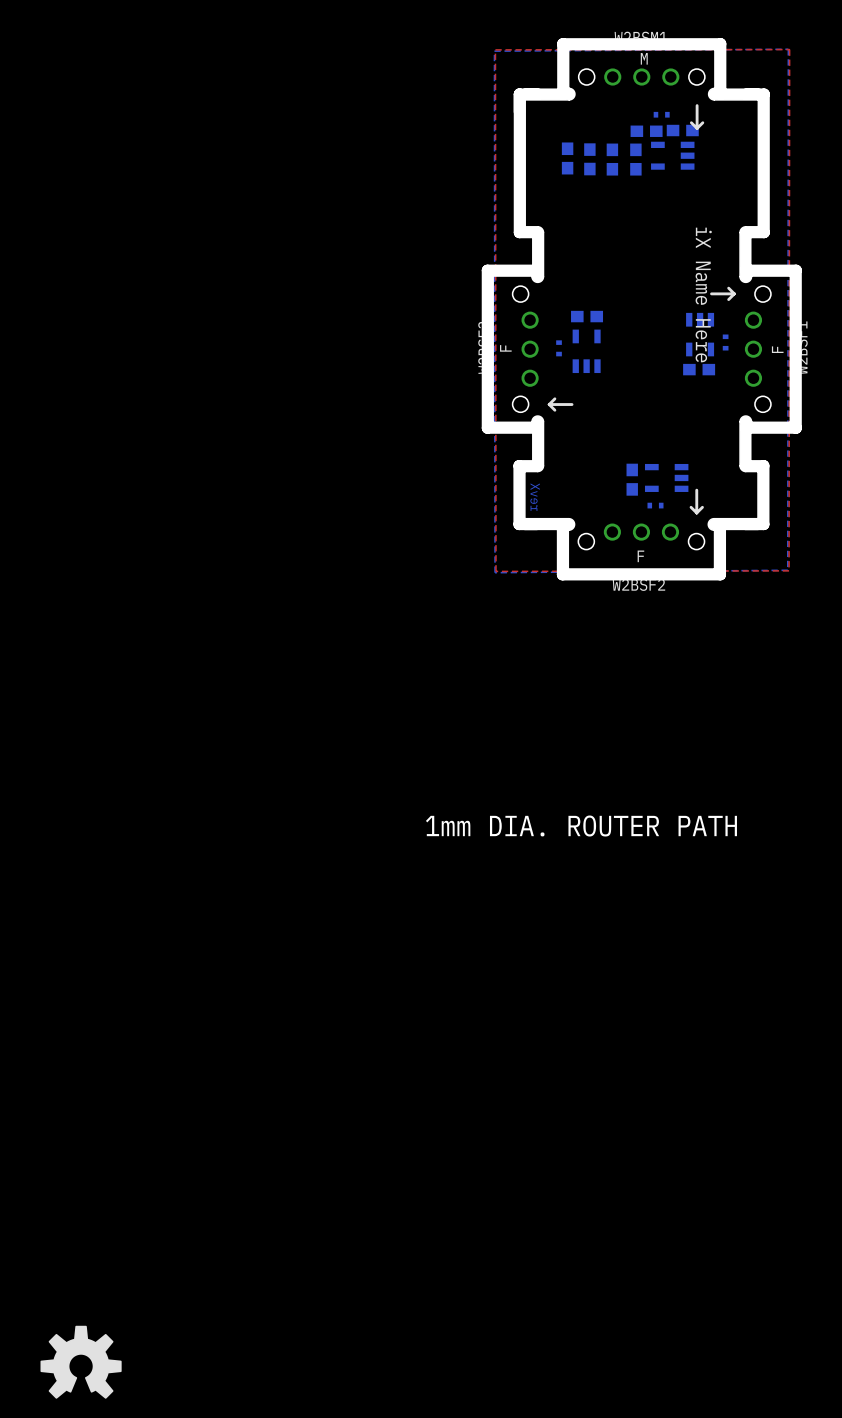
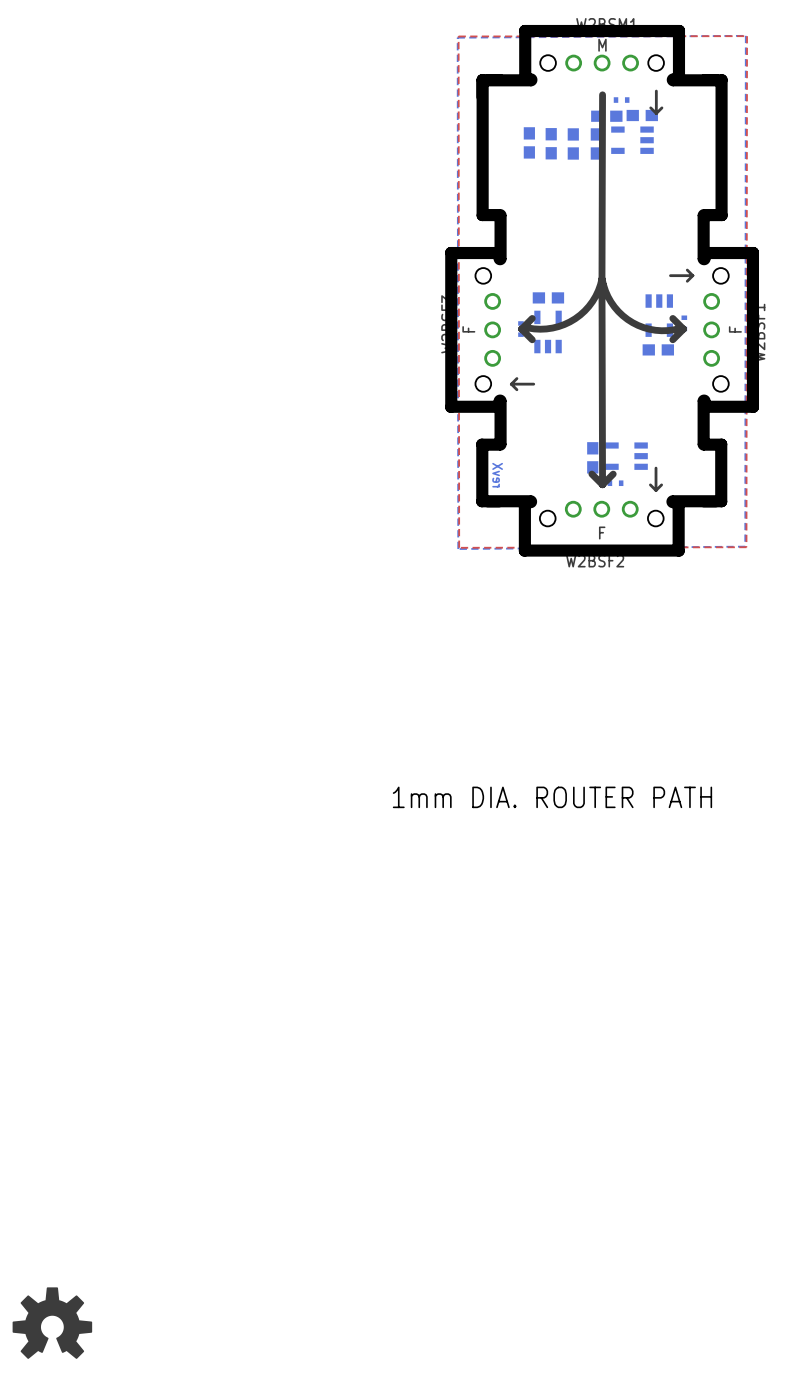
line: none -> (602, 94) (601, 278)
text: iX Name Here (703, 294) -> none
line: none -> (601, 278) (610, 301) (622, 315) (632, 322) (655, 330) (683, 329)
line: none -> (601, 278) (592, 301) (575, 318) (552, 328) (521, 329)
line: none -> (601, 283) (602, 484)
line: none -> (532, 318) (521, 329)
line: none -> (672, 318) (683, 329)
line: none -> (521, 329) (532, 339)
line: none -> (683, 329) (672, 339)
line: none -> (591, 474) (602, 484)
line: none -> (613, 474) (602, 484)

